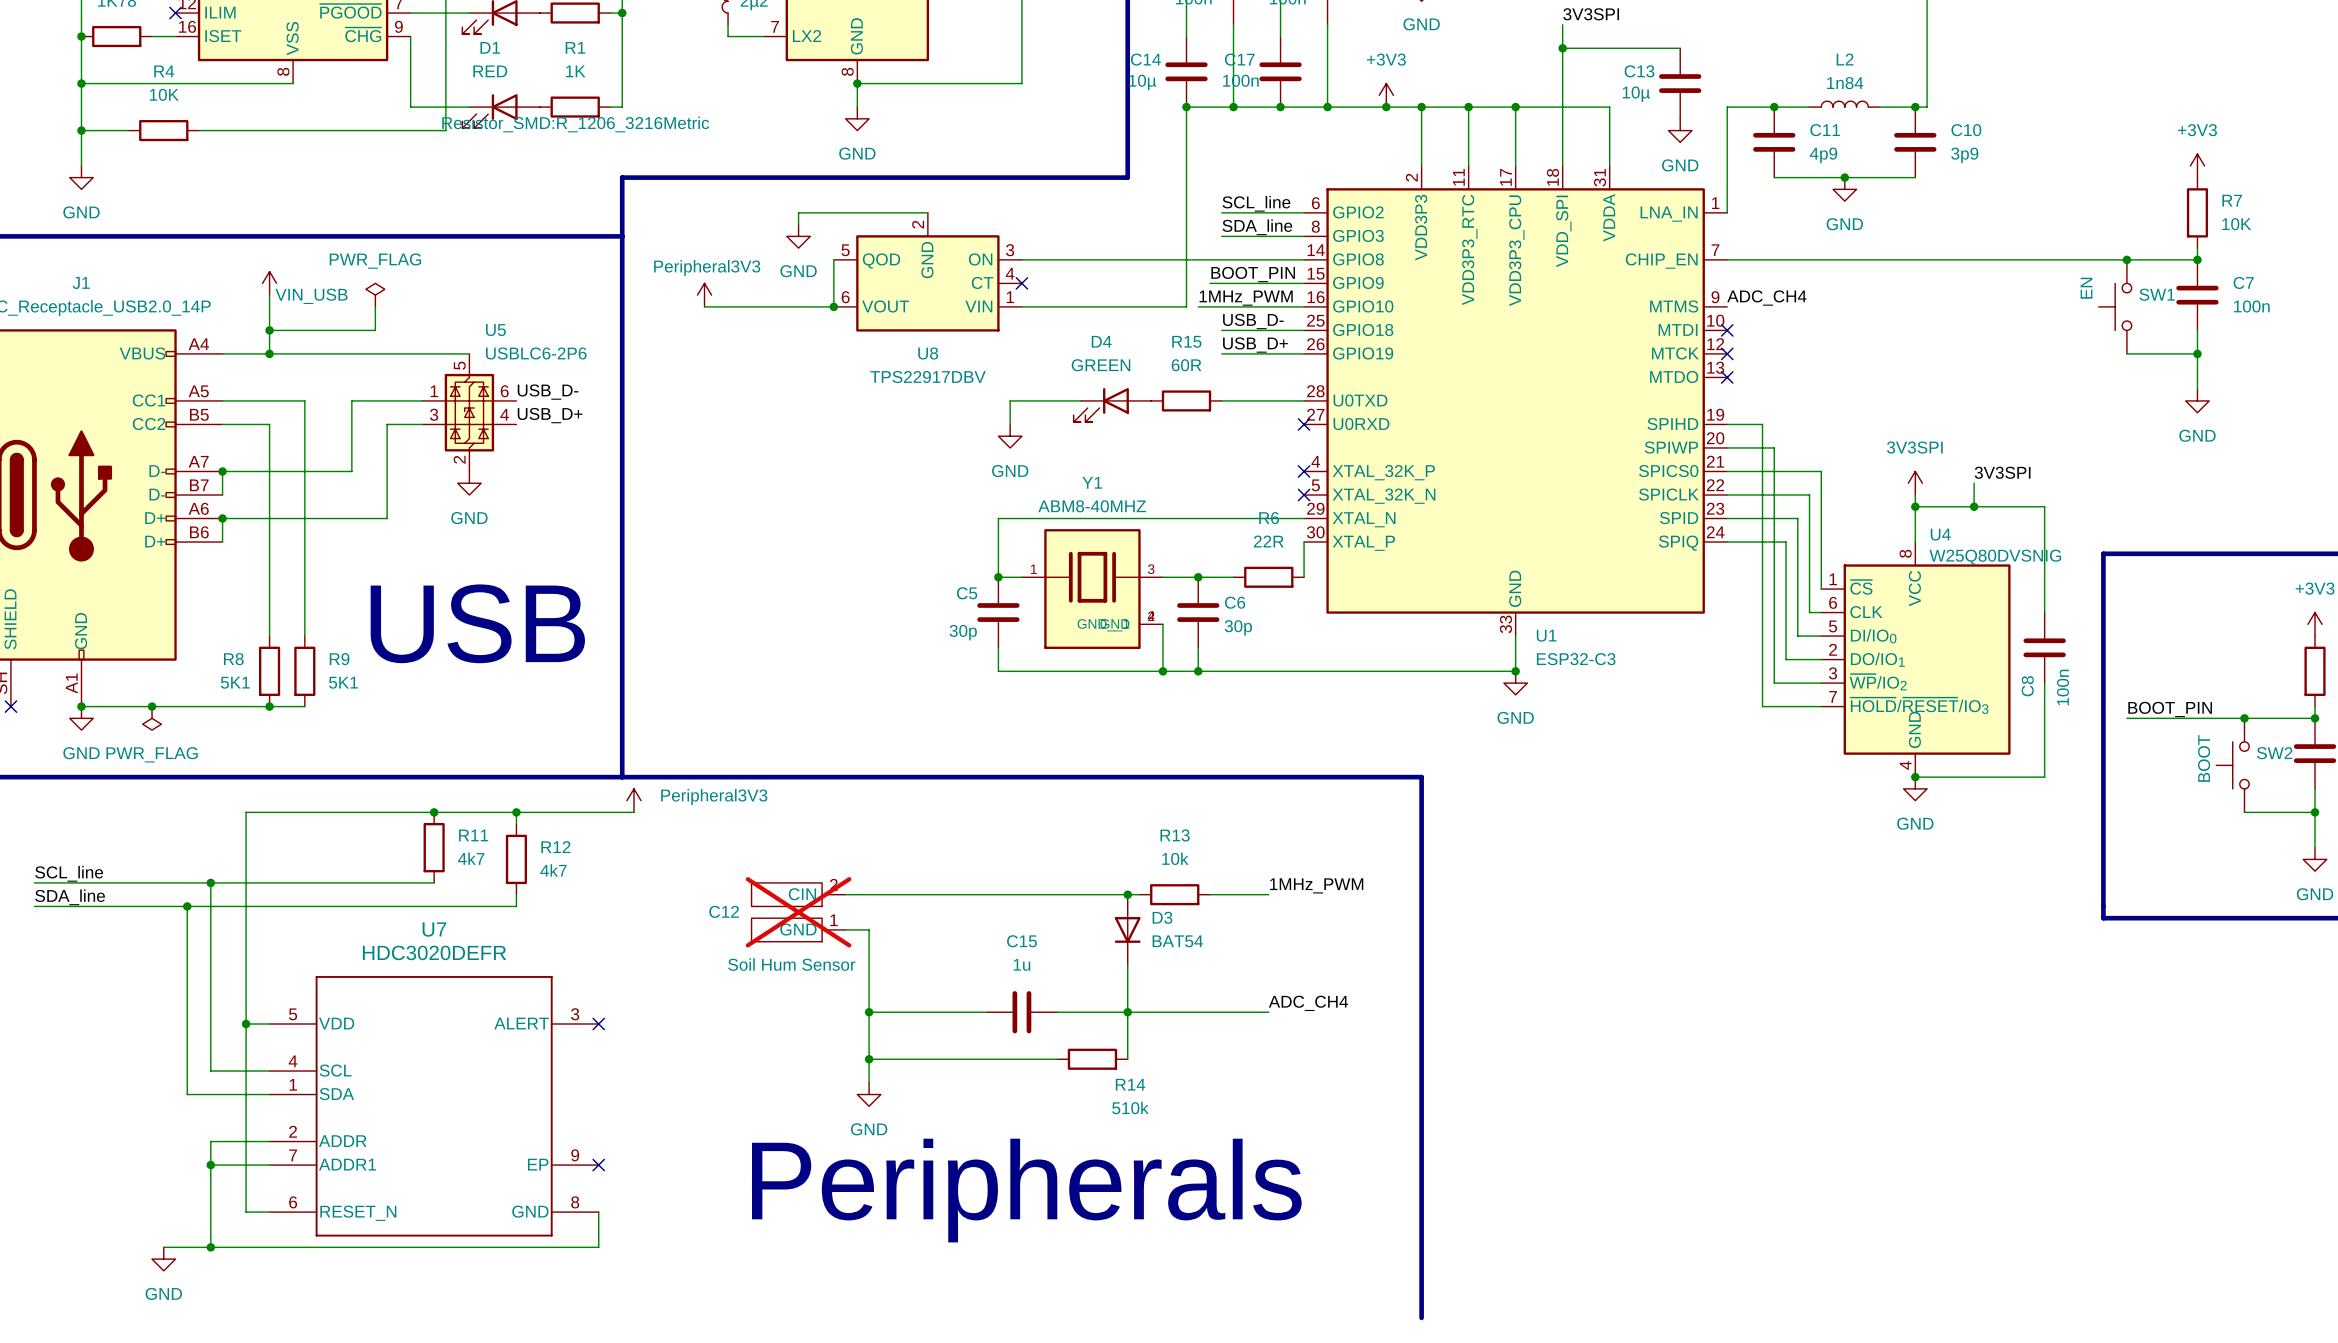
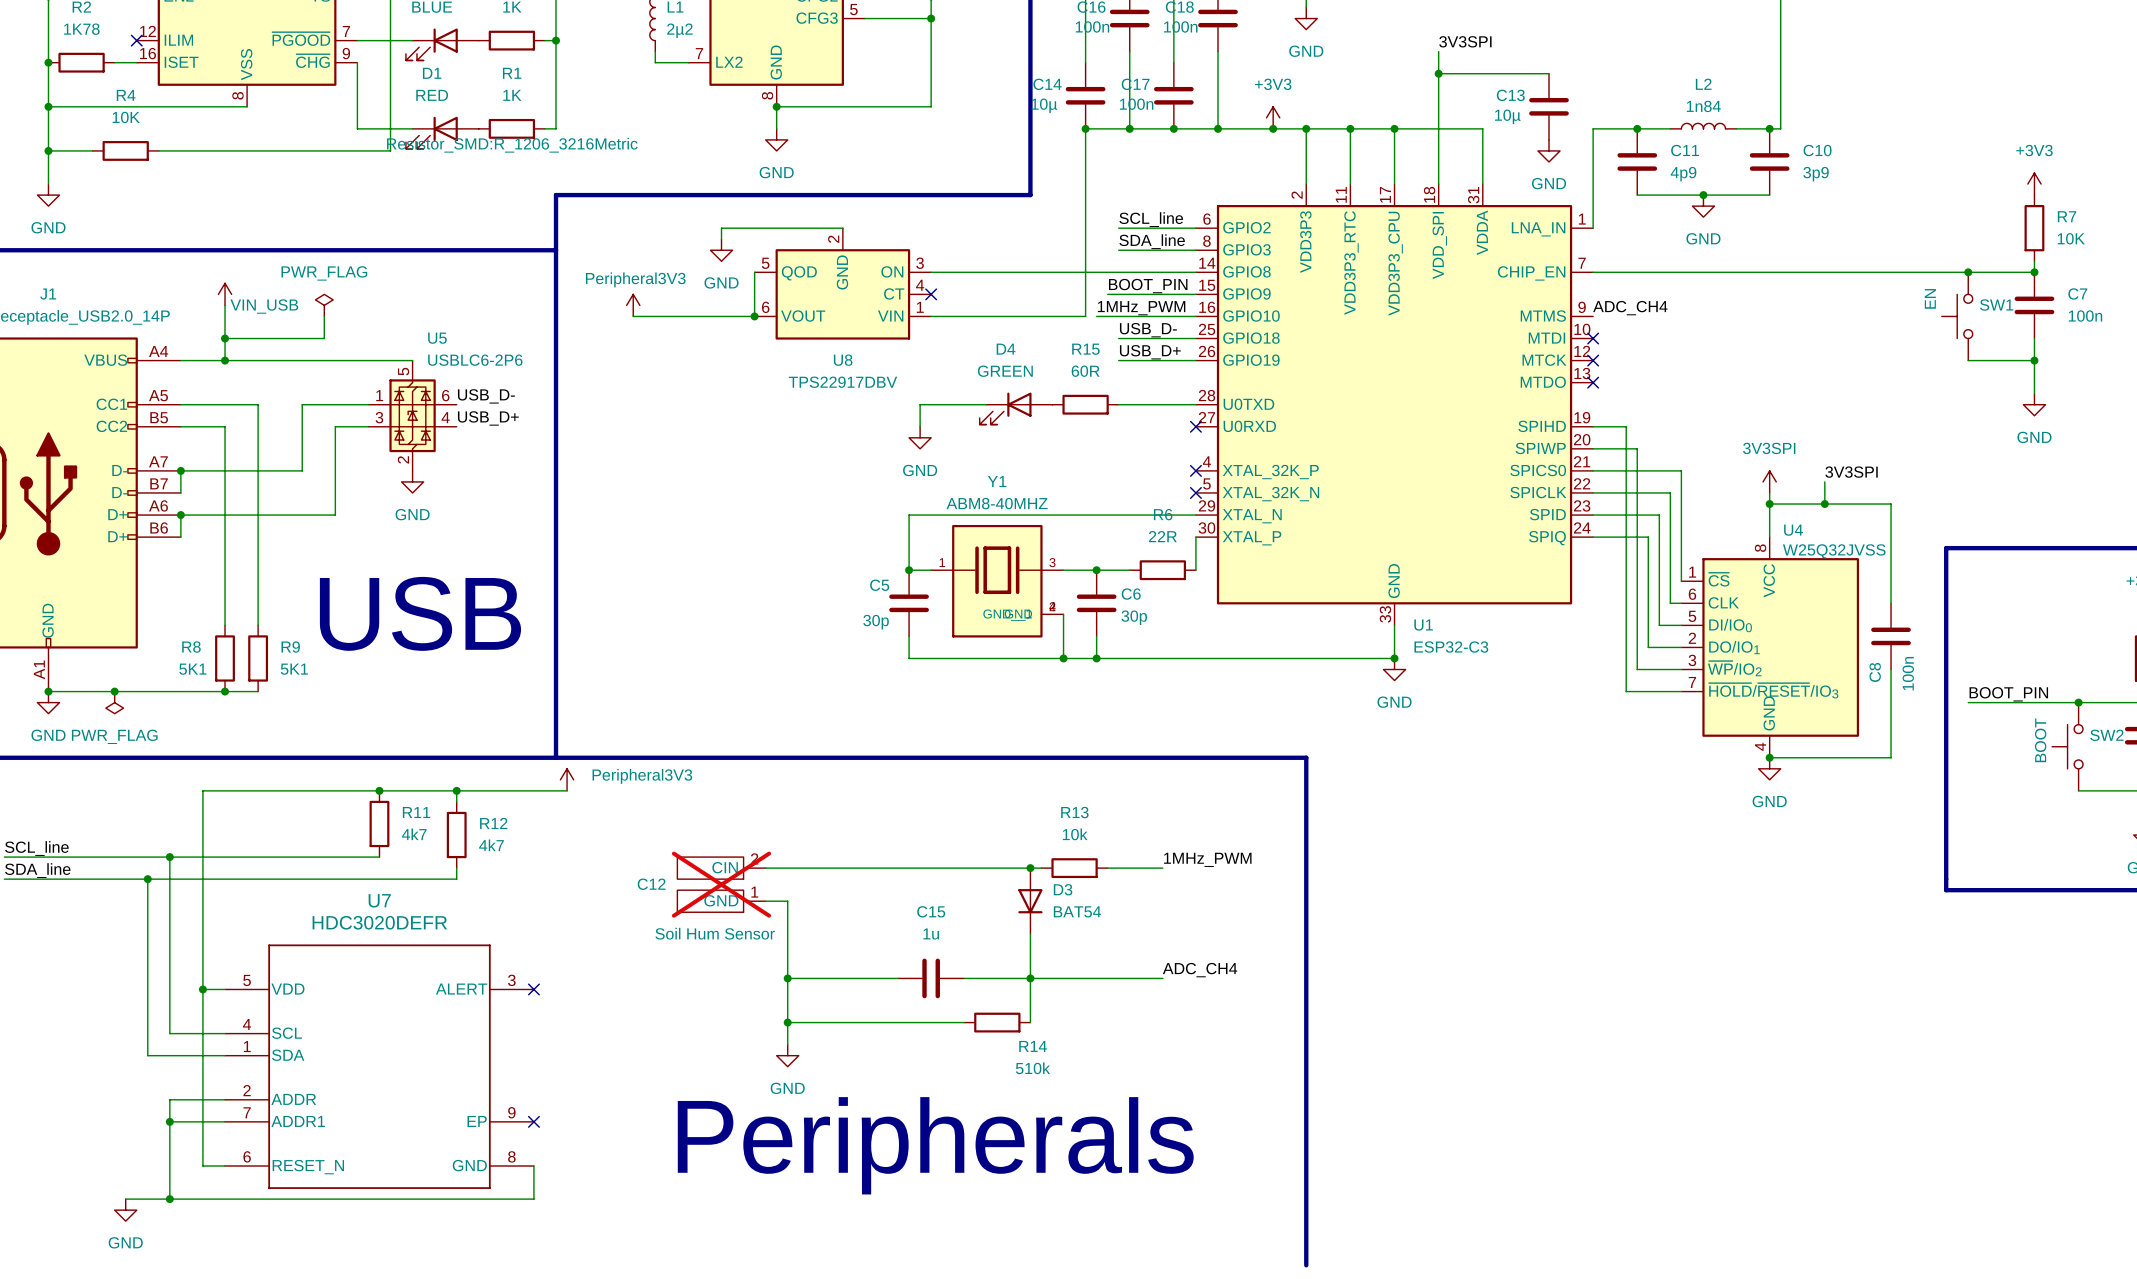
U4 value: W25Q80DVSNIG (1995, 557) -> W25Q32JVSS (1834, 551)

